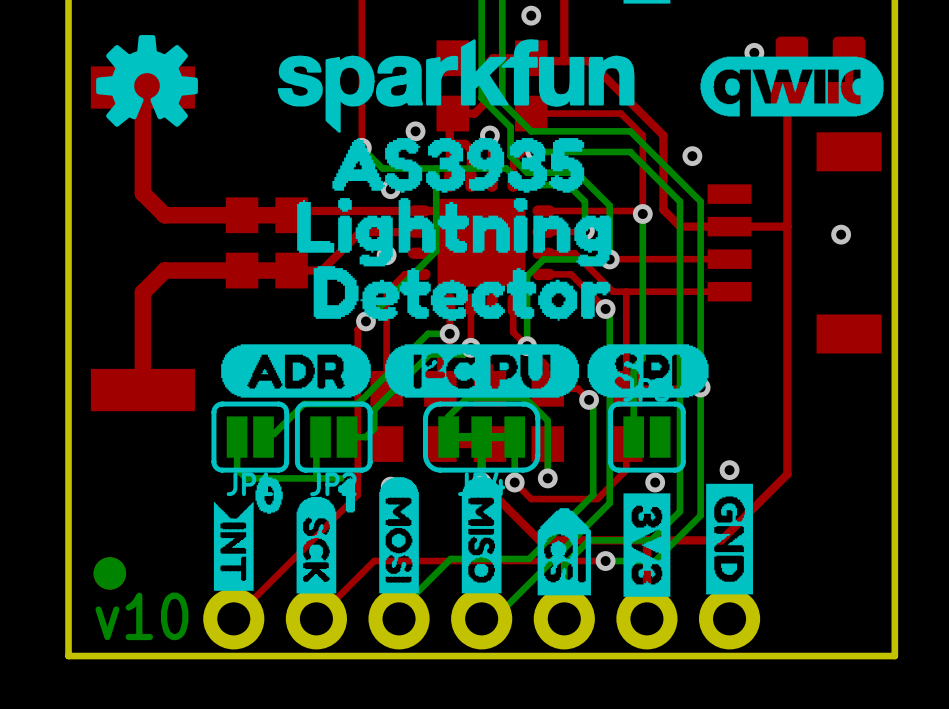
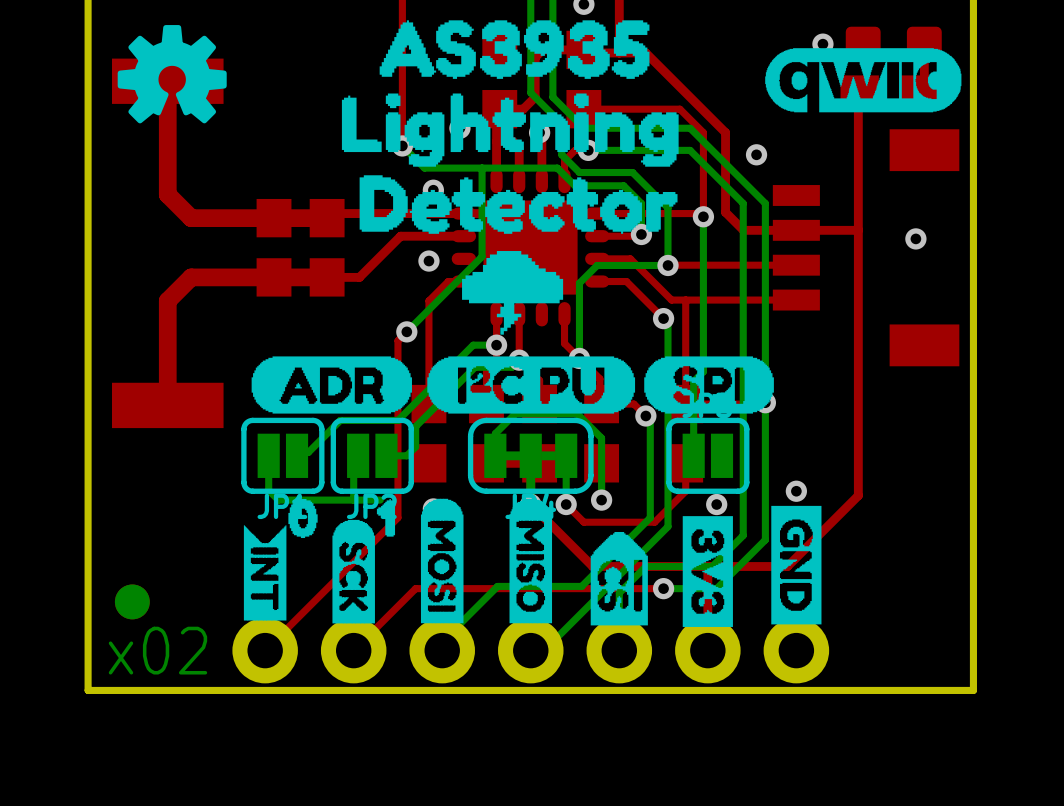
drawing: [277, 39, 635, 133] -> none
drawing position: (458, 165) -> (514, 49)
drawing position: (454, 232) -> (510, 130)
drawing: none -> [462, 251, 564, 335]
drawing position: (462, 293) -> (518, 204)
text: v10 (141, 616) -> none
text: none -> x02 (157, 650)

